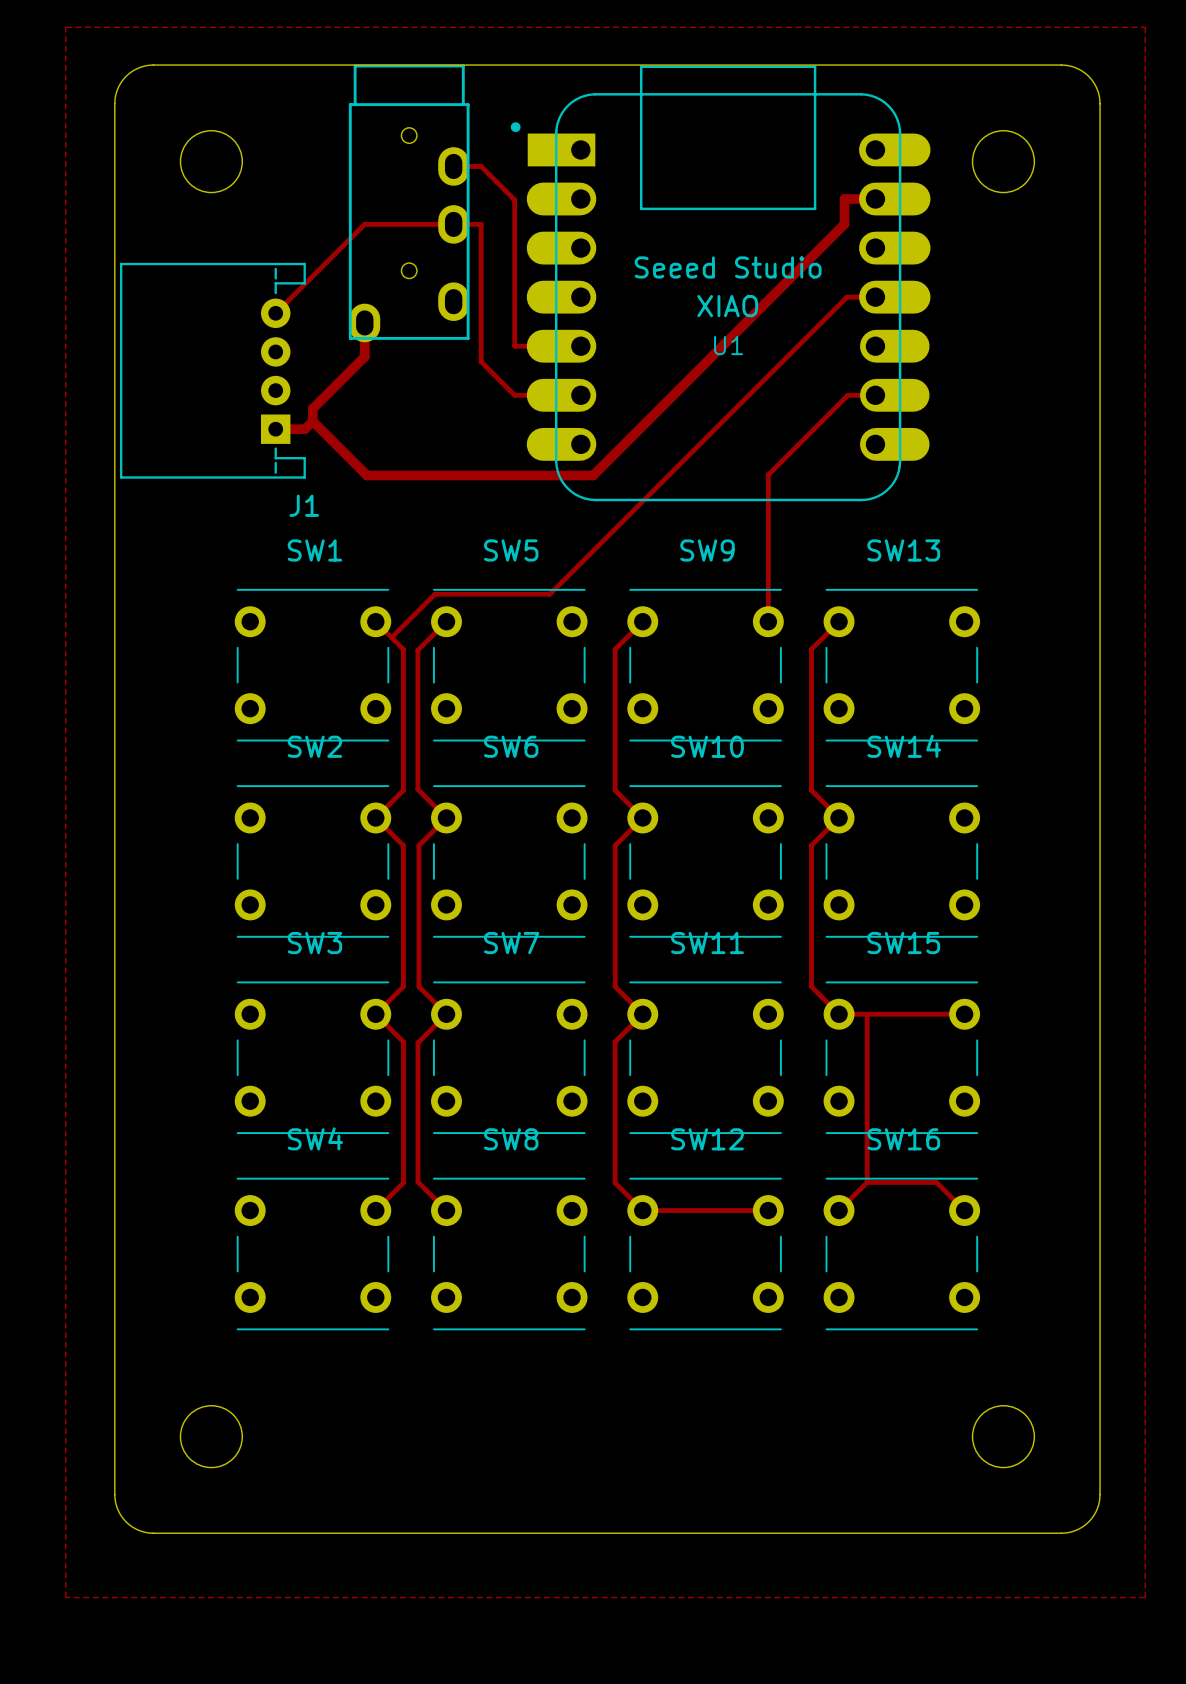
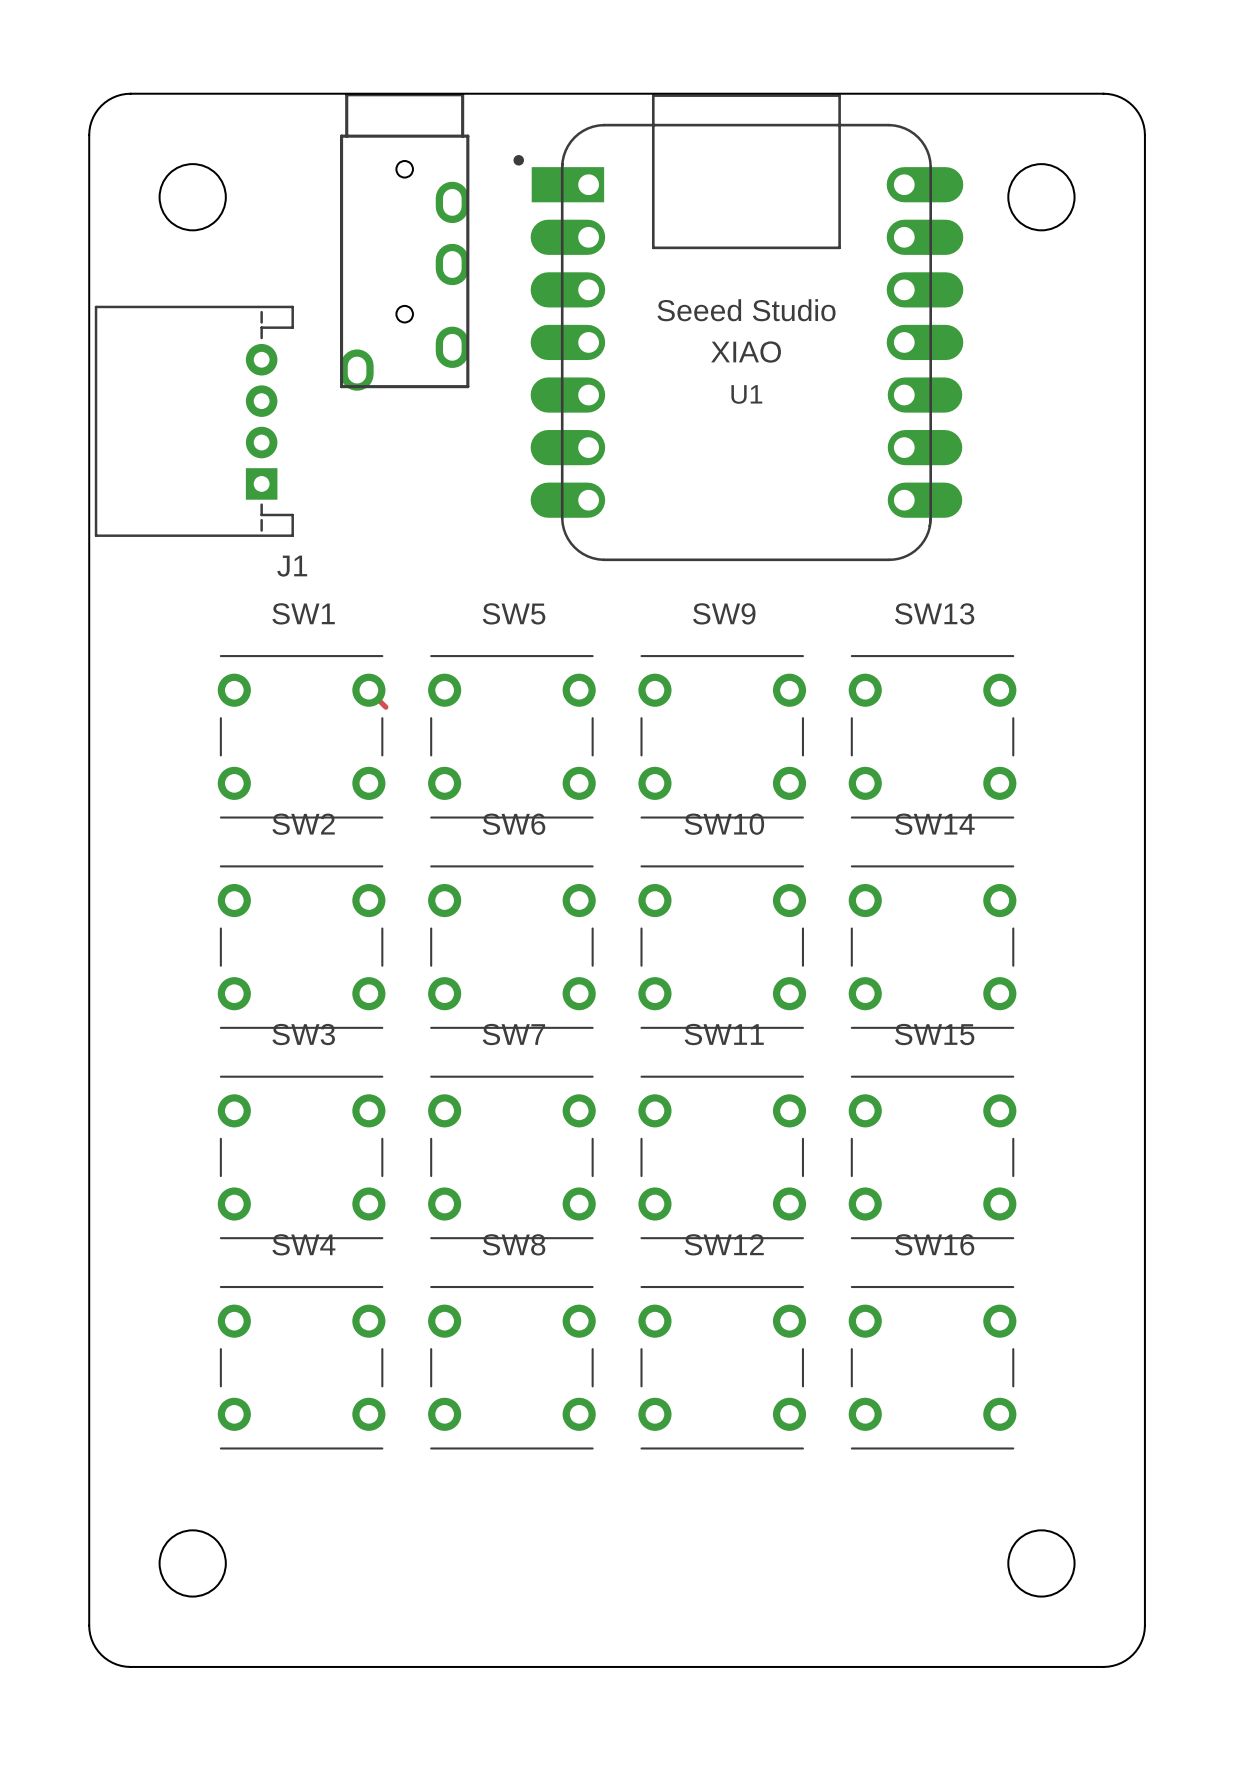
zone outline: (65, 27) (65, 1597) (1145, 1597) (1145, 27) (65, 27) -> none
track: (453, 166) (481, 166) (514, 199) (514, 346) (580, 346) -> none
track: (875, 199) (844, 199) (844, 224) (593, 475) (366, 475) (312, 421) -> none
track: (875, 297) (846, 297) (549, 594) (435, 594) (391, 637) (403, 649) (403, 790) (375, 817) (403, 845) (403, 986) (375, 1014) (403, 1041) (403, 1182) (375, 1210) -> none
track: (275, 313) (364, 224) (481, 224) (481, 361) (514, 395) (580, 395) -> none
track: (364, 322) (364, 356) (312, 408) (312, 421) -> none
track: (875, 395) (847, 395) (768, 474) (768, 621) -> none
track: (312, 421) (304, 429) (275, 429) -> none
track: (446, 621) (417, 650) (417, 789) (446, 817) (418, 845) (418, 986) (446, 1014) (417, 1042) (417, 1182) (446, 1210) -> none
track: (642, 621) (615, 649) (615, 790) (642, 817) (615, 845) (615, 986) (642, 1014) (615, 1041) (615, 1182) (642, 1210) (768, 1210) -> none
track: (839, 621) (811, 649) (811, 790) (839, 817) (811, 845) (811, 986) (839, 1014) (964, 1014) -> none
track: (867, 1014) (867, 1182) -> none
track: (867, 1182) (936, 1182) (964, 1210) -> none
track: (867, 1182) (839, 1210) -> none

